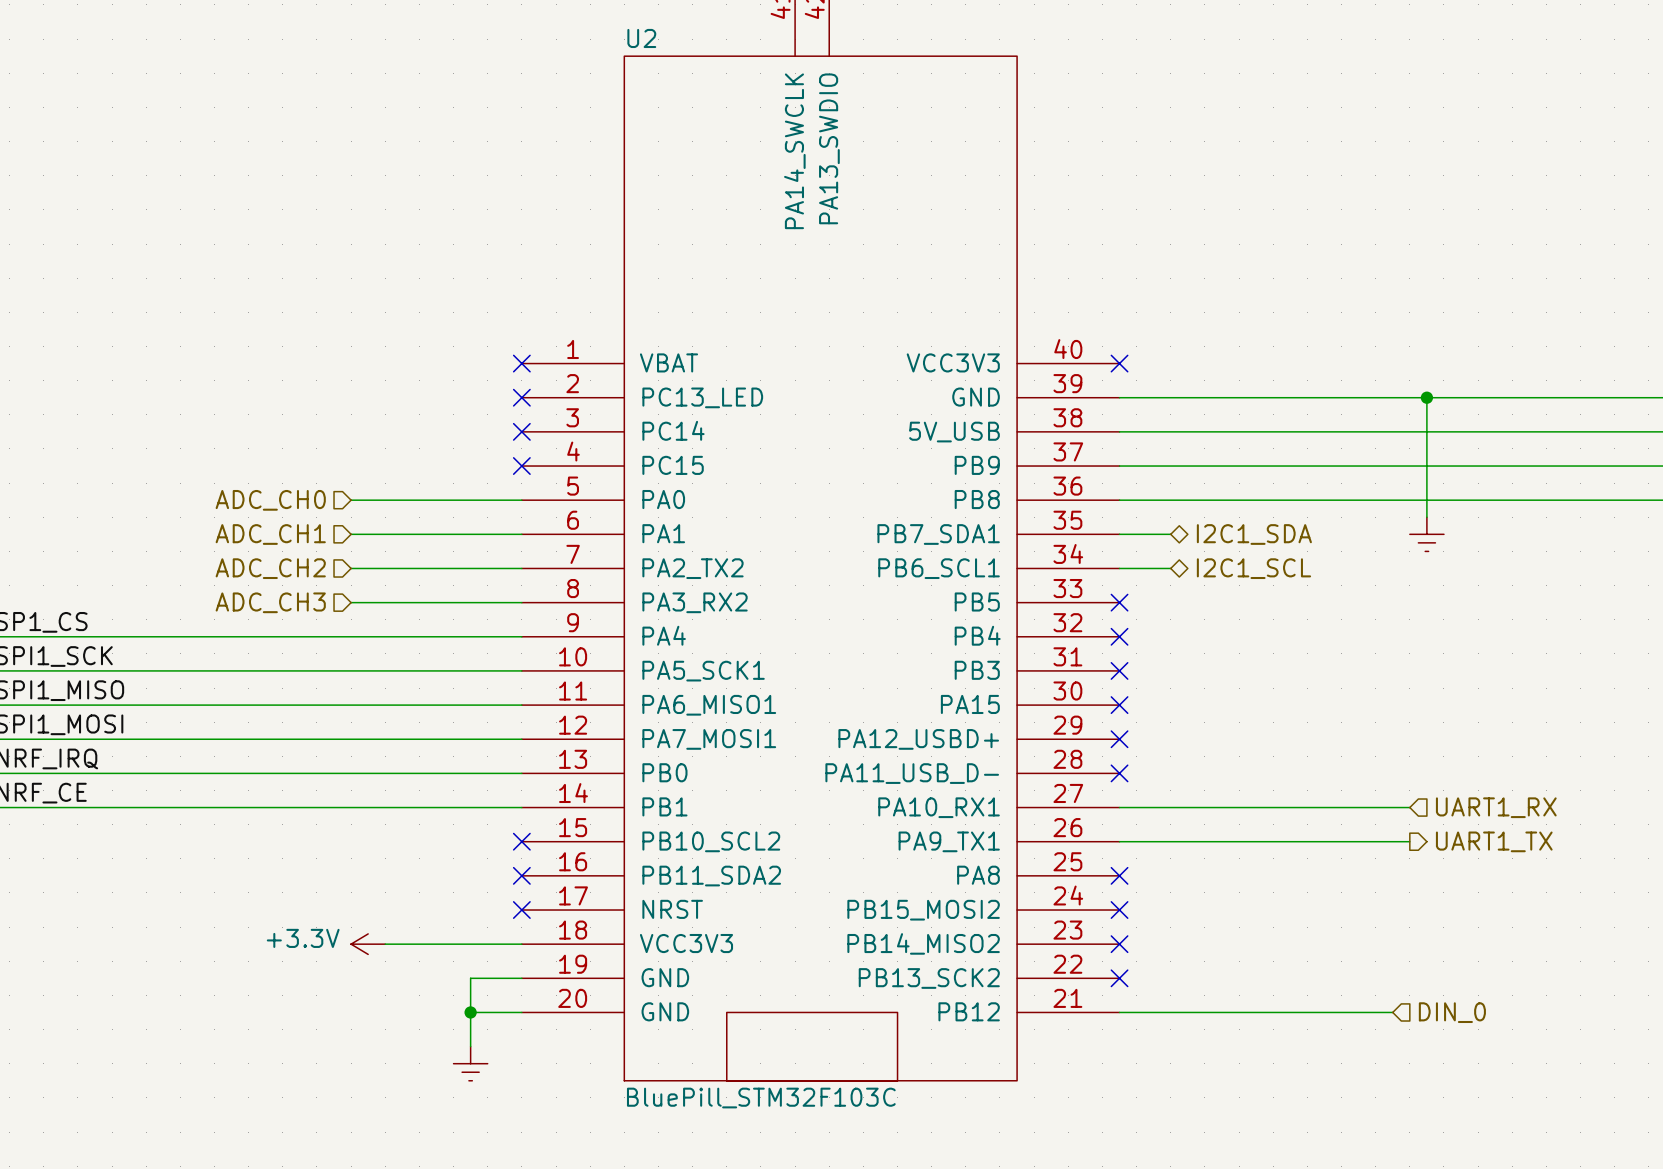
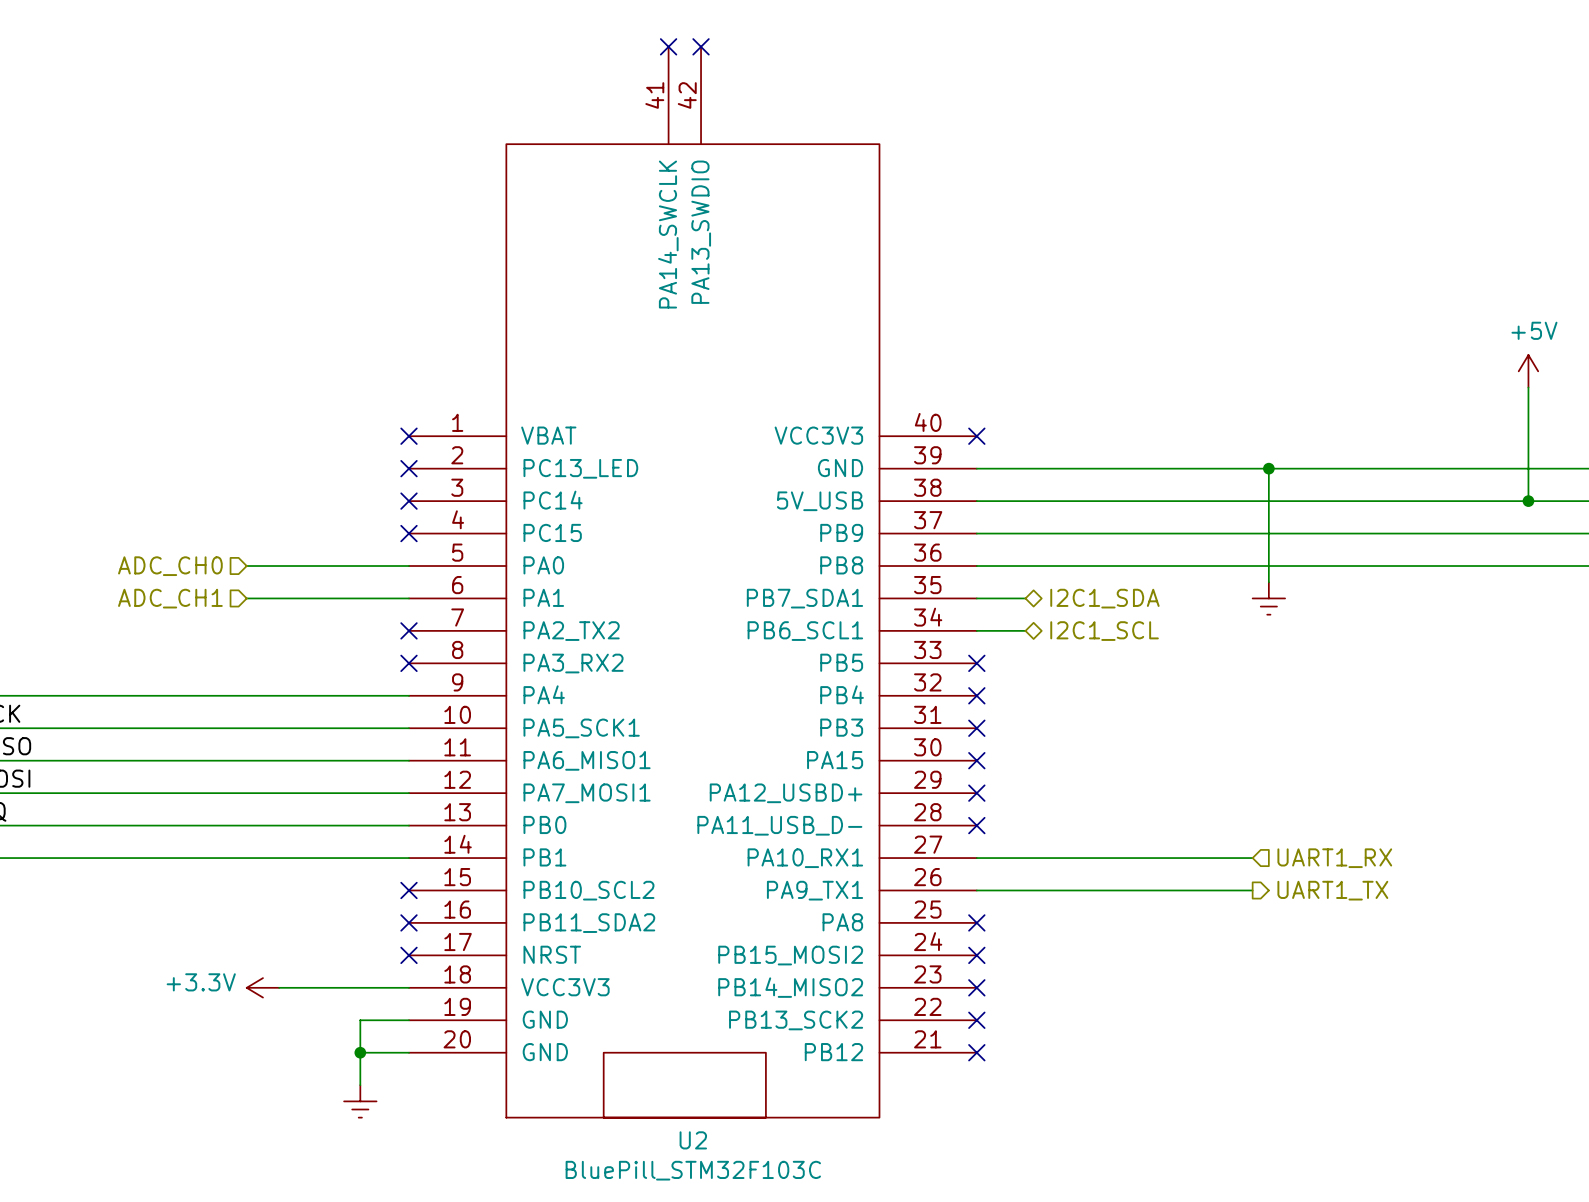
U2 name position: U2 (641, 38) -> U2 (693, 1140)
hierarchical label: ADC_CH2 (270, 568) -> none
wire: (351, 568) (521, 568) -> none
no-connect mark: none -> (408, 630)
hierarchical label: ADC_CH3 (270, 602) -> none
wire: (351, 602) (521, 602) -> none
no-connect mark: none -> (408, 663)
wire: (1119, 1012) (1392, 1012) -> none
no-connect mark: none -> (976, 1052)
hierarchical label: DIN_0 (1452, 1012) -> none
U2 value position: BluePill_STM32F103C (761, 1098) -> BluePill_STM32F103C (693, 1170)

